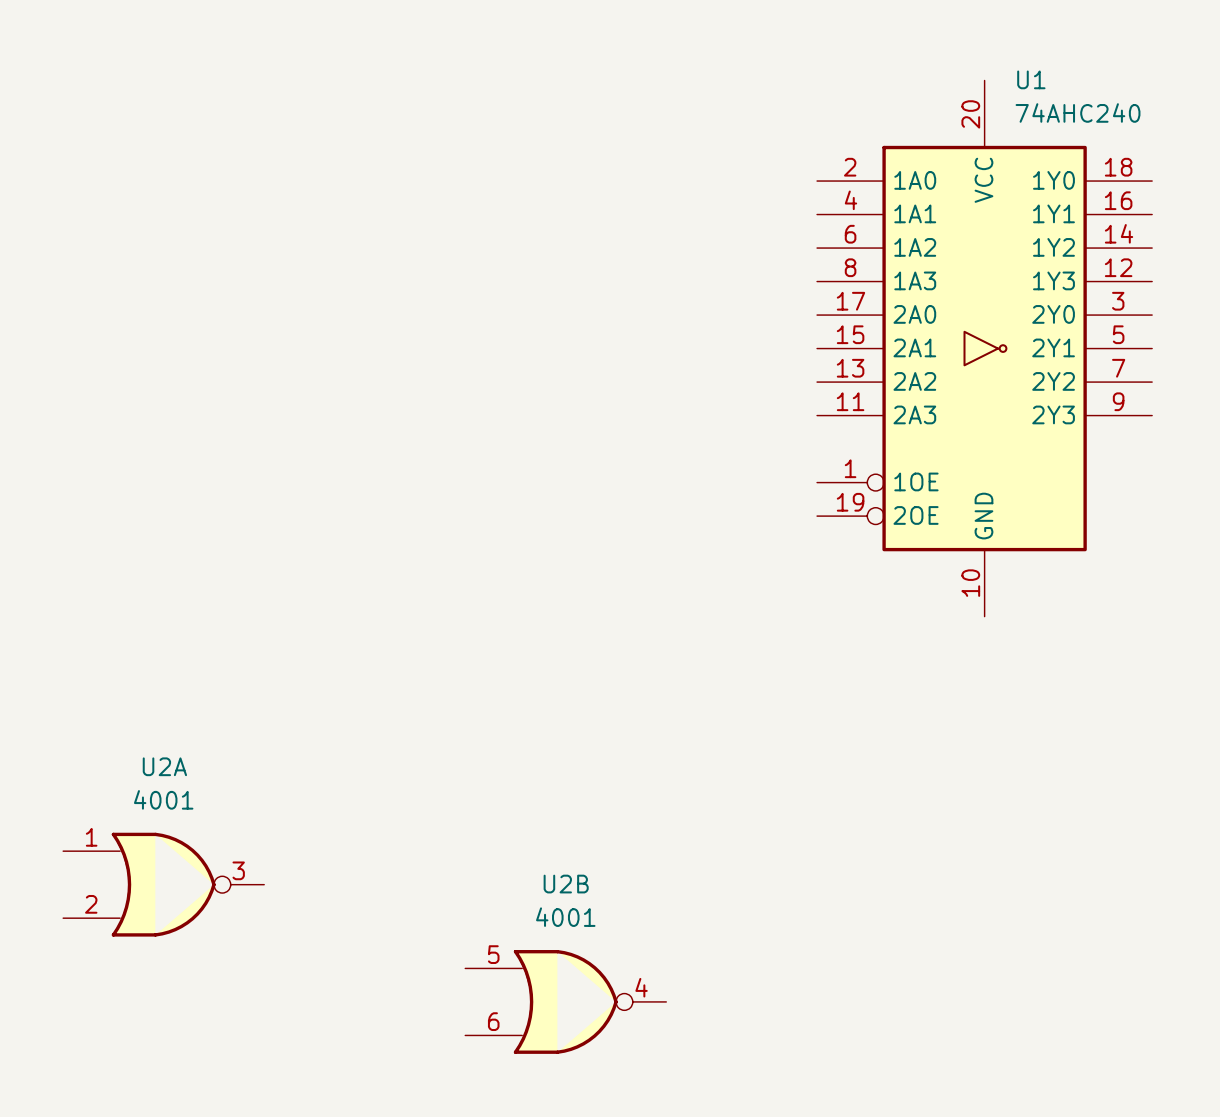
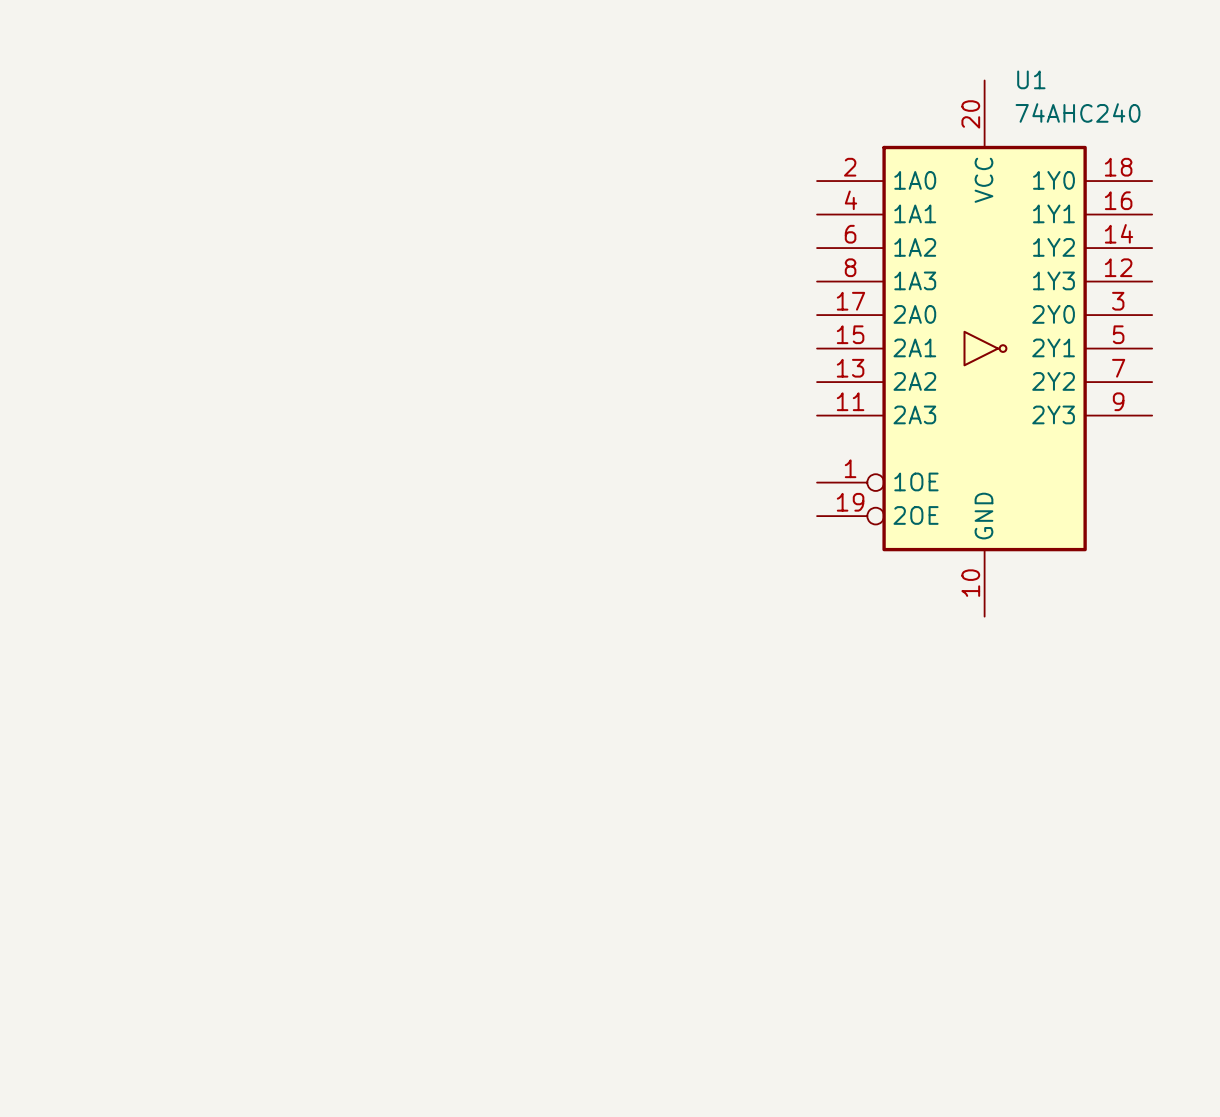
U2A: 4001 (163, 884) -> none
U2B: 4001 (565, 1001) -> none

